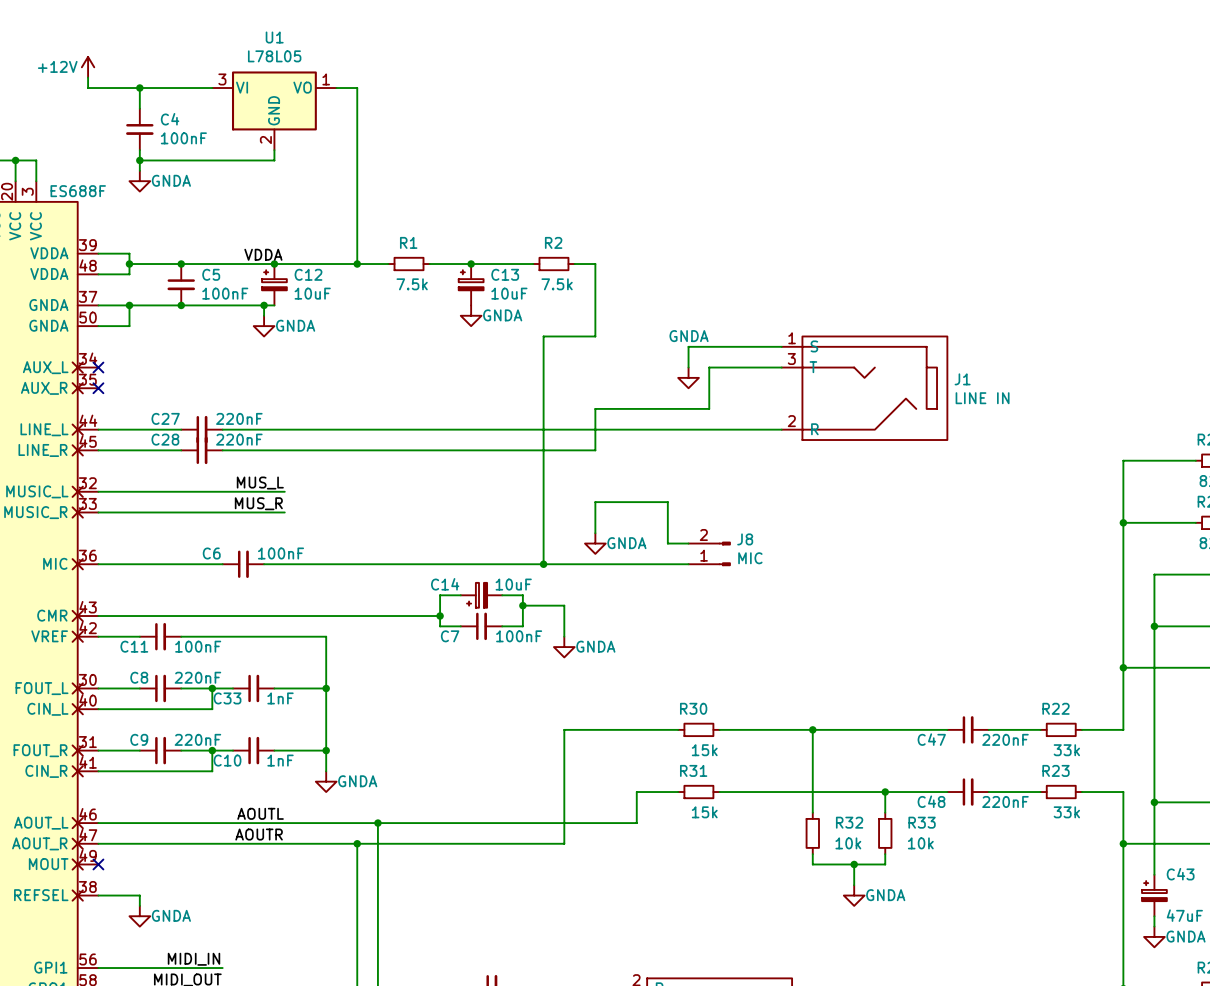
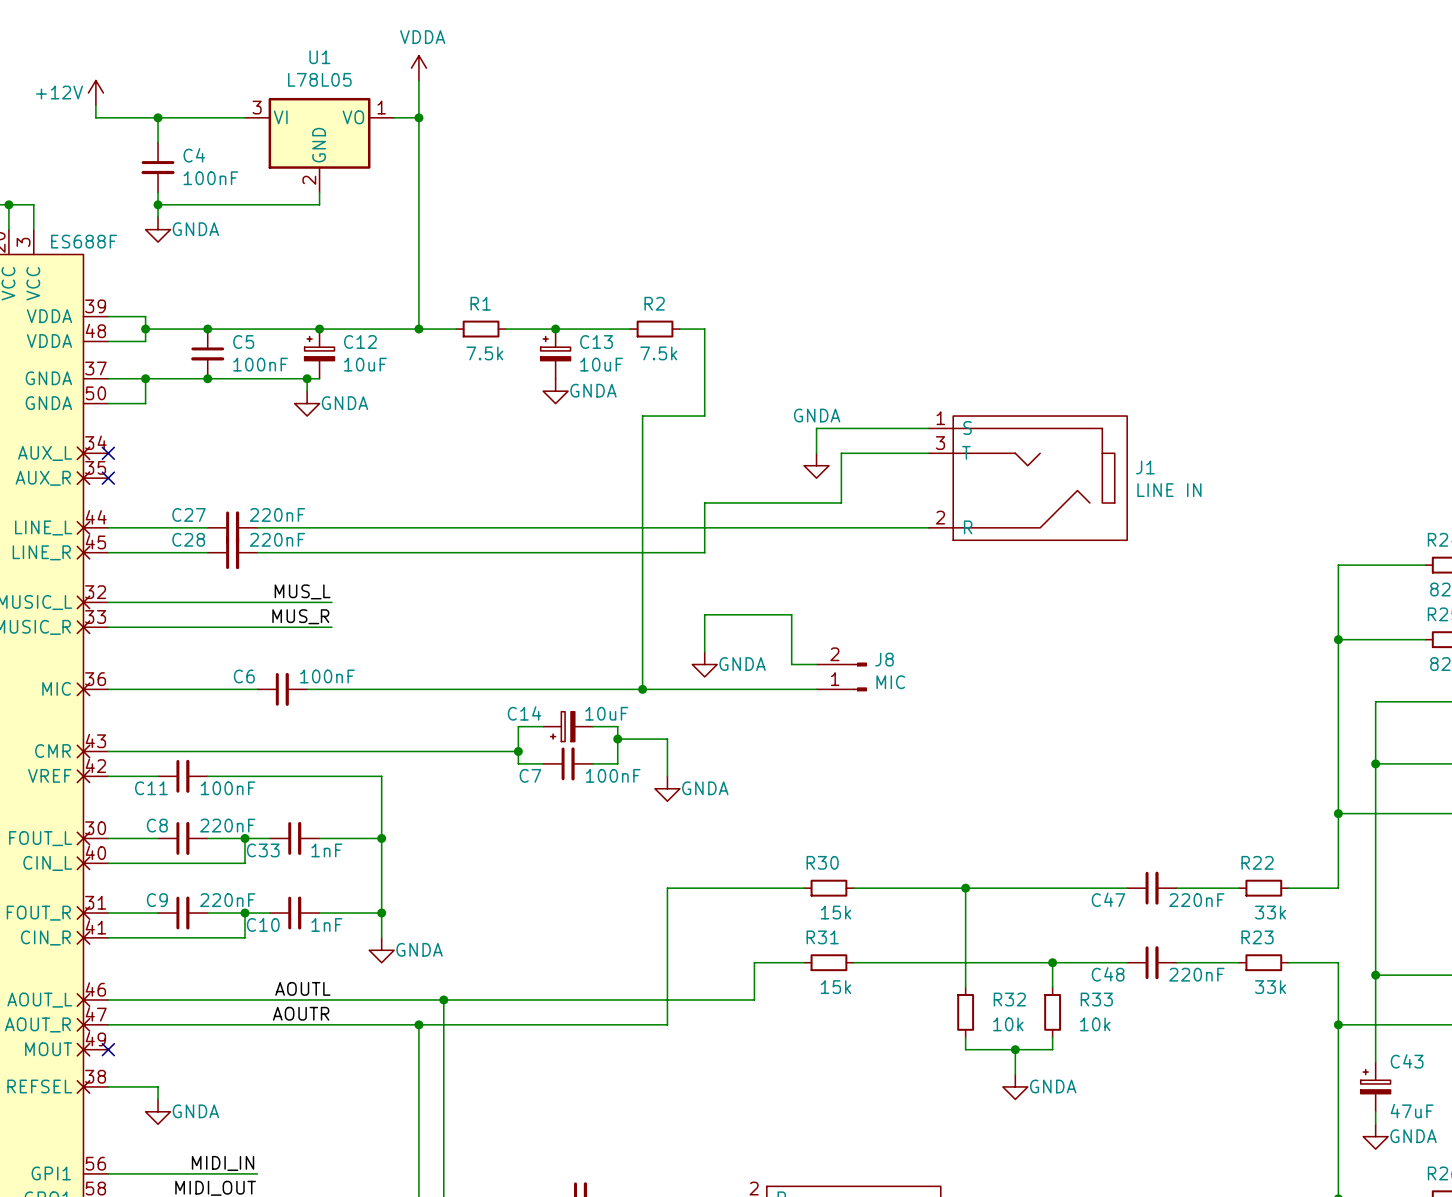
power symbol: none -> VDDA (418, 68)
wire: none -> (418, 80) (418, 117)
junction: none -> (418, 117)
label: VDDA (263, 254) -> none

